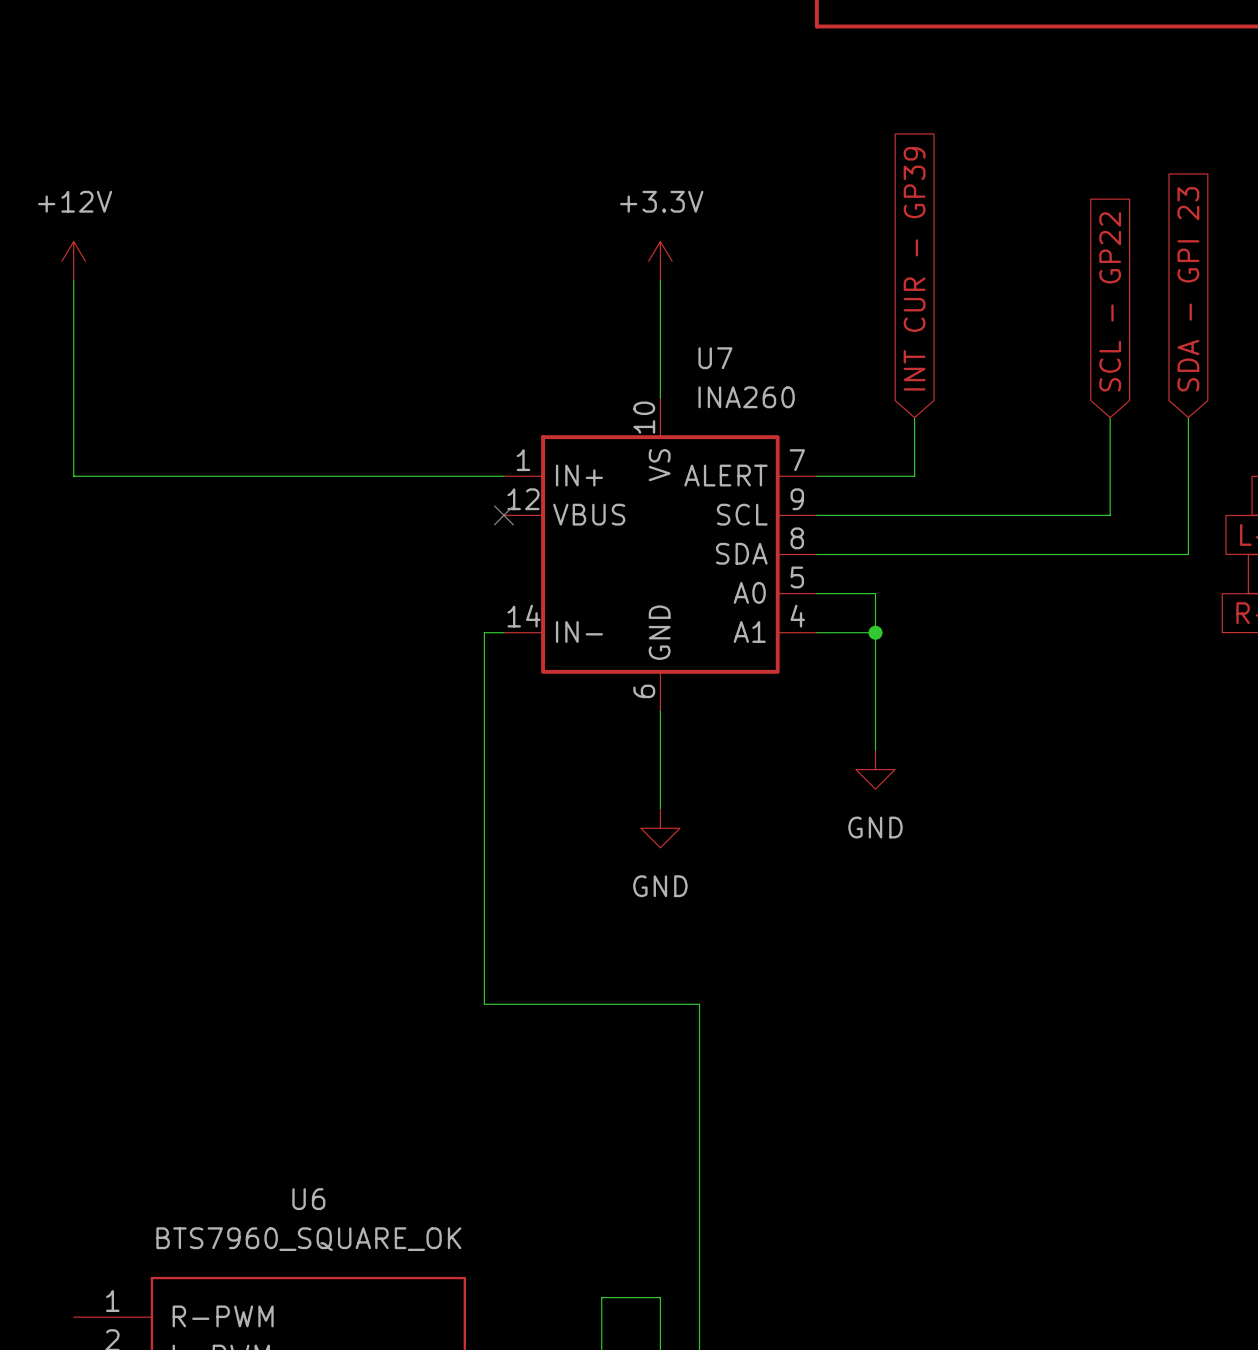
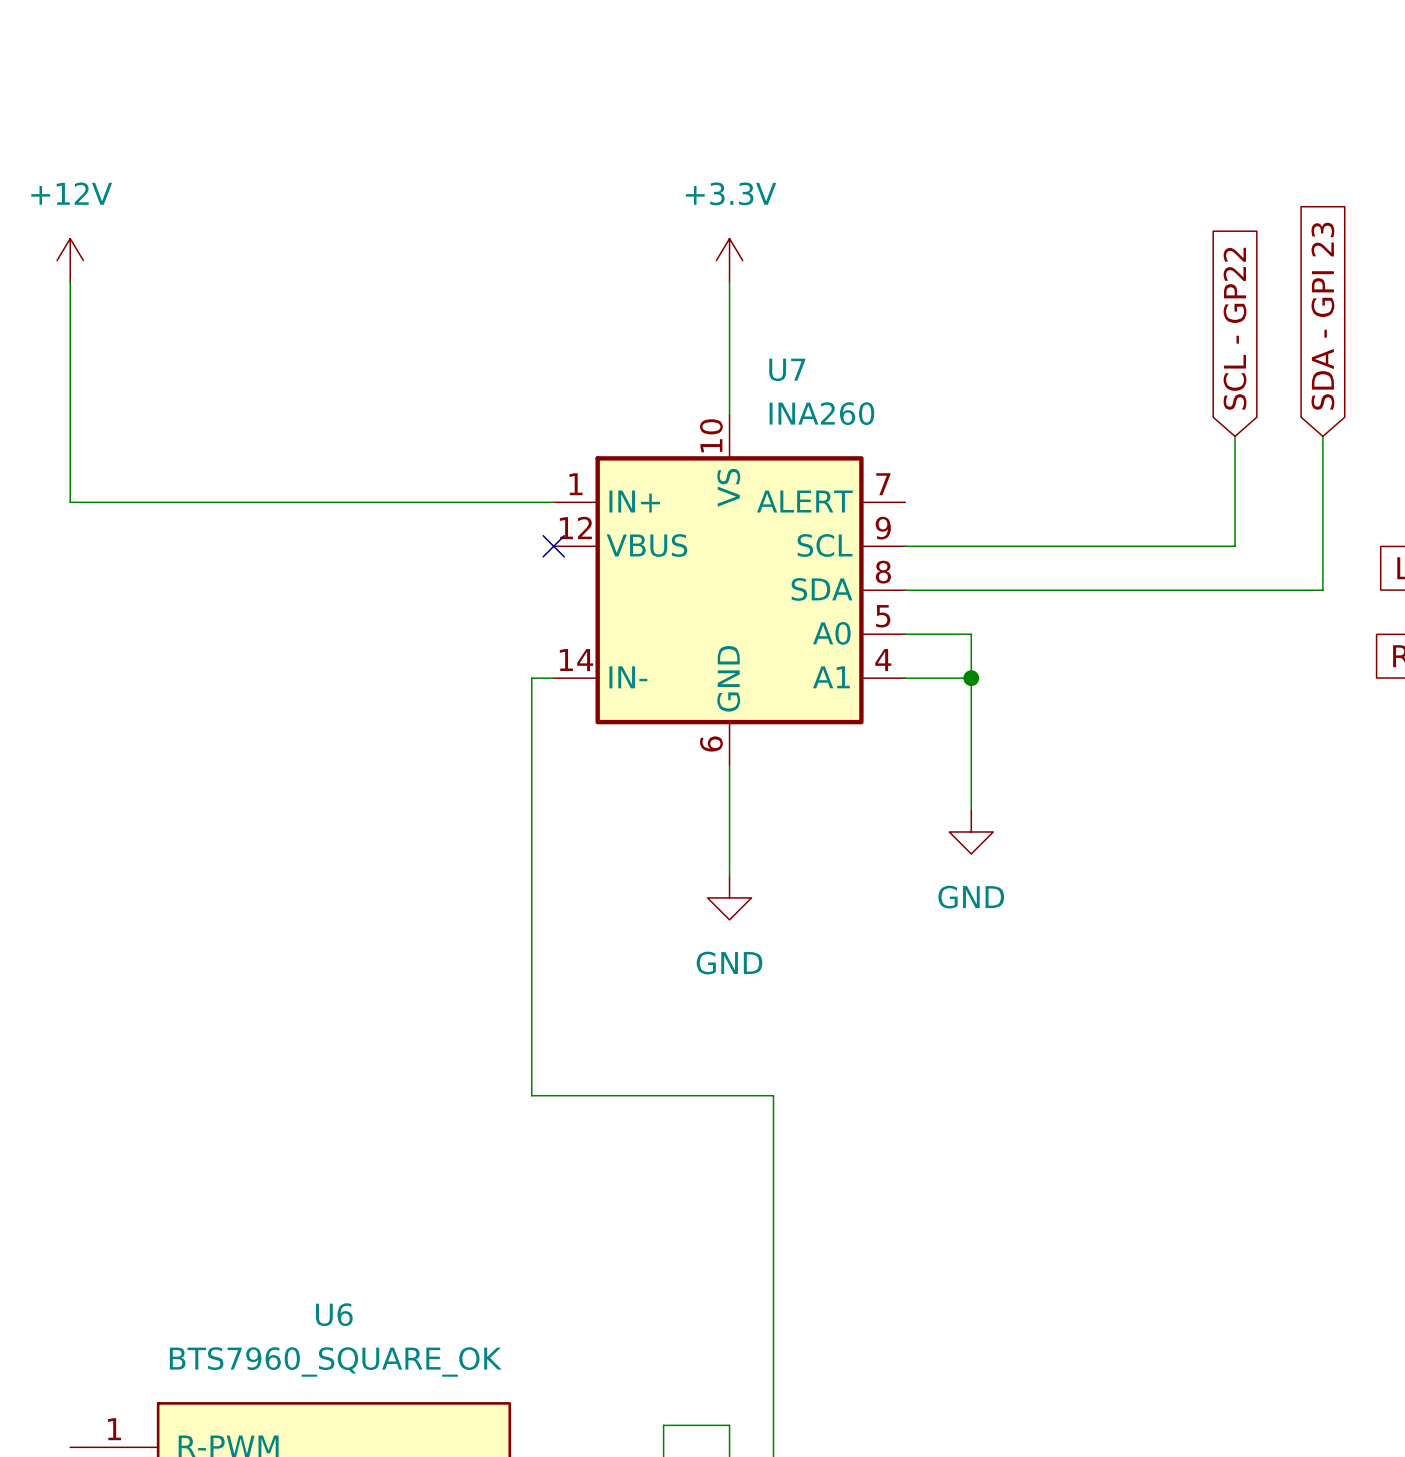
global label: INT CUR - GP39 (914, 268) -> none
wire: (914, 417) (914, 476) (816, 476) -> none

